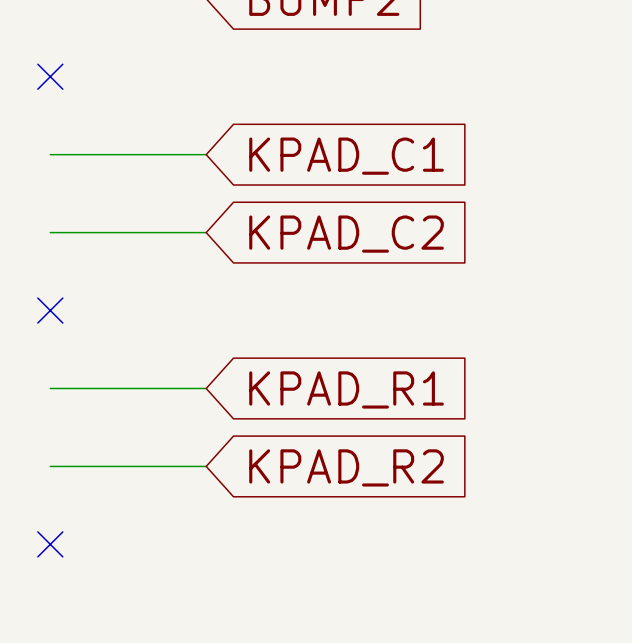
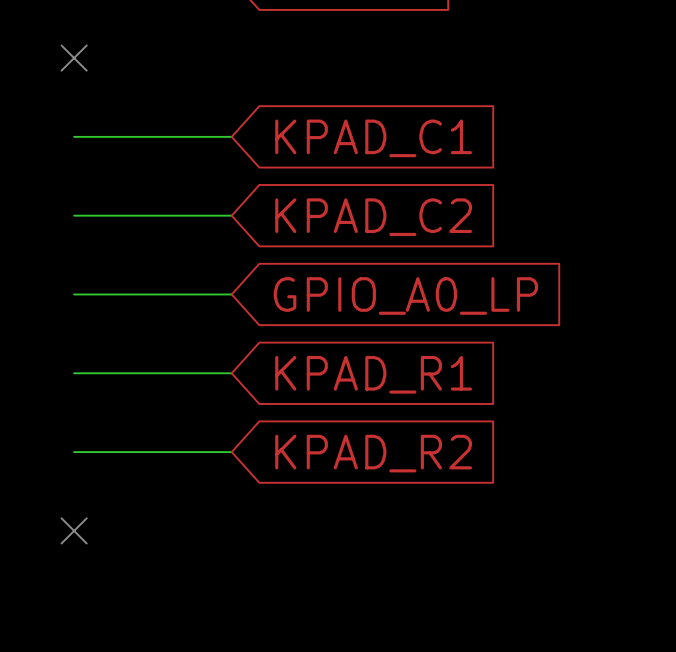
wire: none -> (74, 294) (231, 294)
no-connect mark: (50, 310) -> none
global label: none -> GPIO_A0_LP (405, 295)

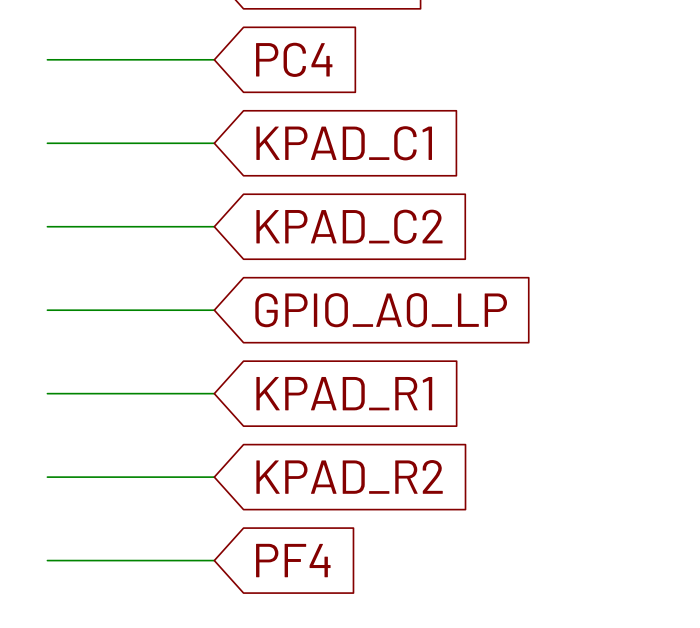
global label: none -> PC4 (294, 59)
wire: none -> (47, 59) (214, 59)
no-connect mark: (74, 58) -> none
wire: none -> (47, 560) (214, 560)
no-connect mark: (74, 530) -> none
global label: none -> PF4 (293, 560)

